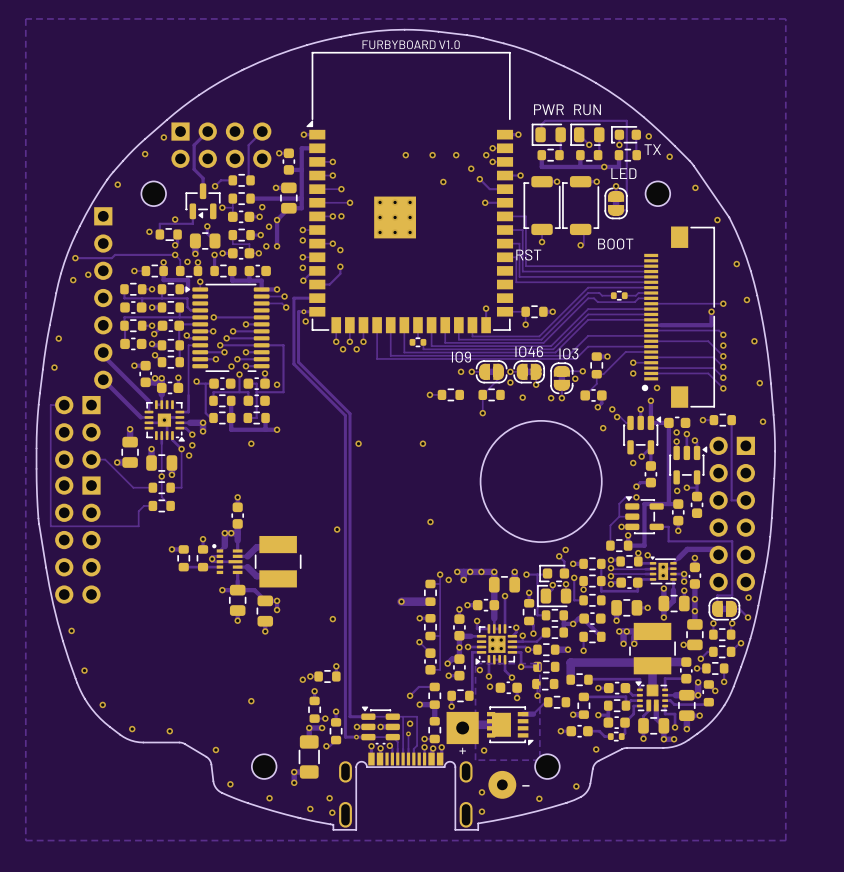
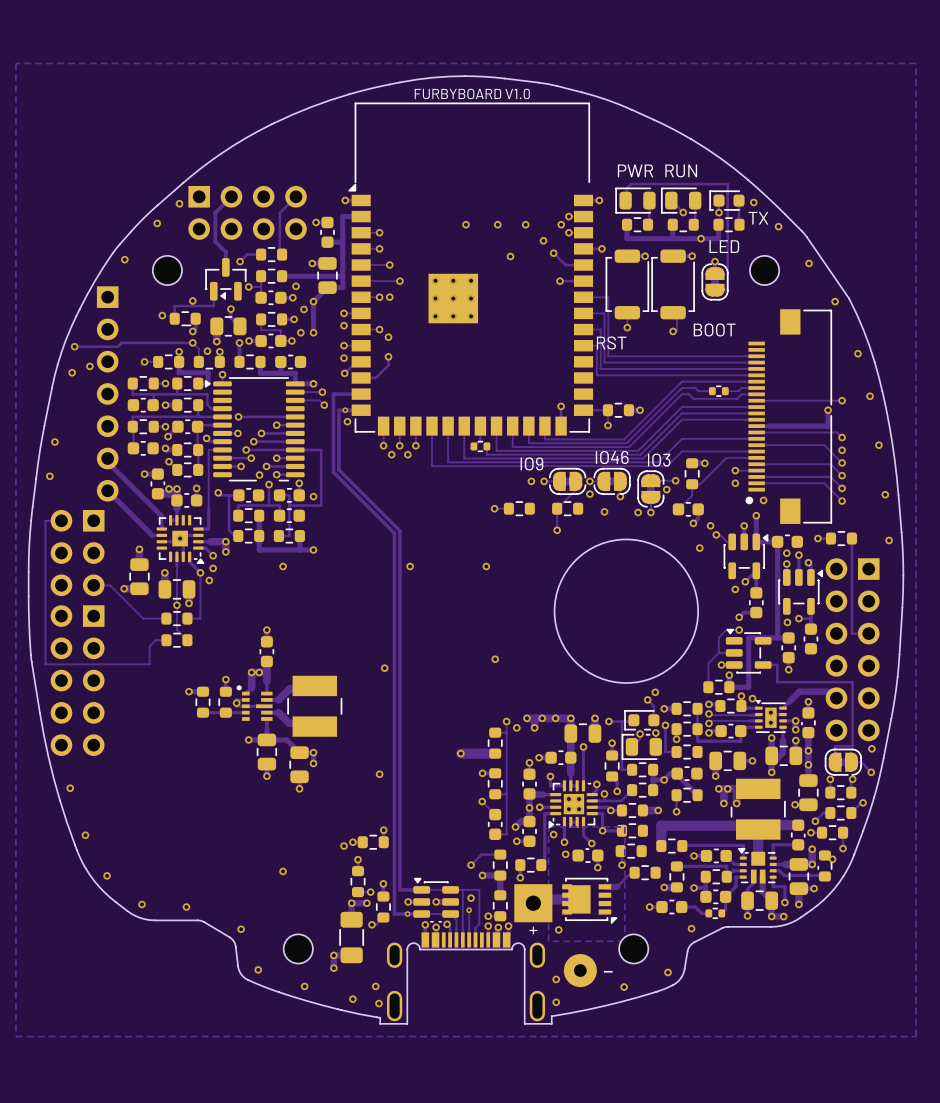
part footprint: [702, 680, 714, 707] -> [817, 850, 833, 882]

